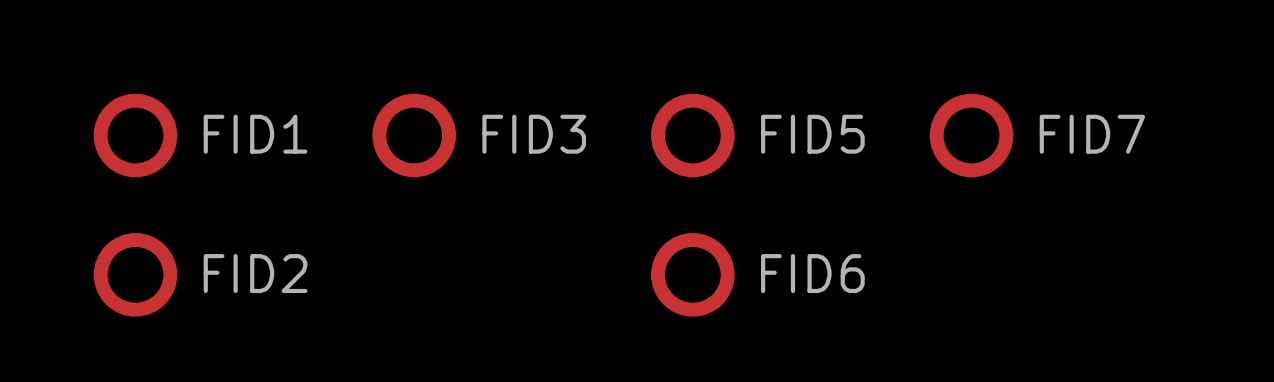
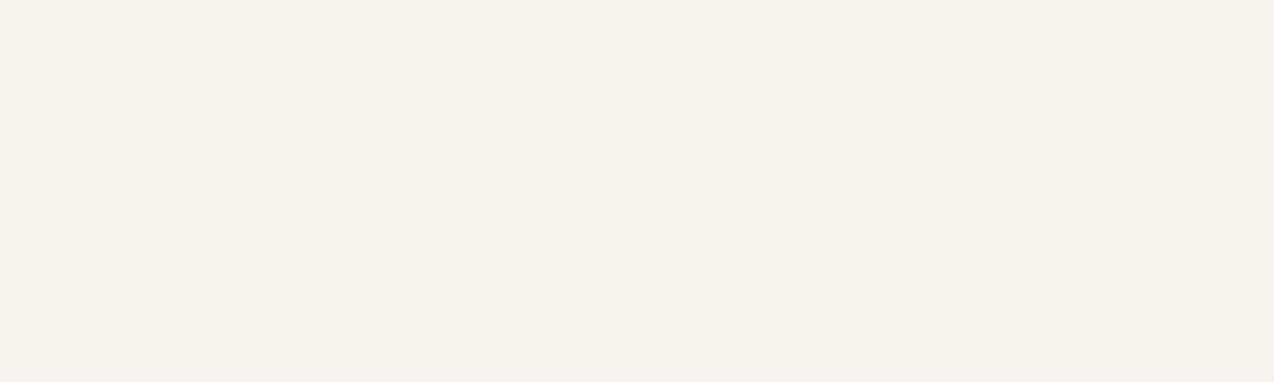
FID1: (135, 135) -> none
FID3: (414, 135) -> none
FID5: (692, 135) -> none
FID7: (971, 135) -> none
FID2: (135, 274) -> none
FID6: (692, 274) -> none

